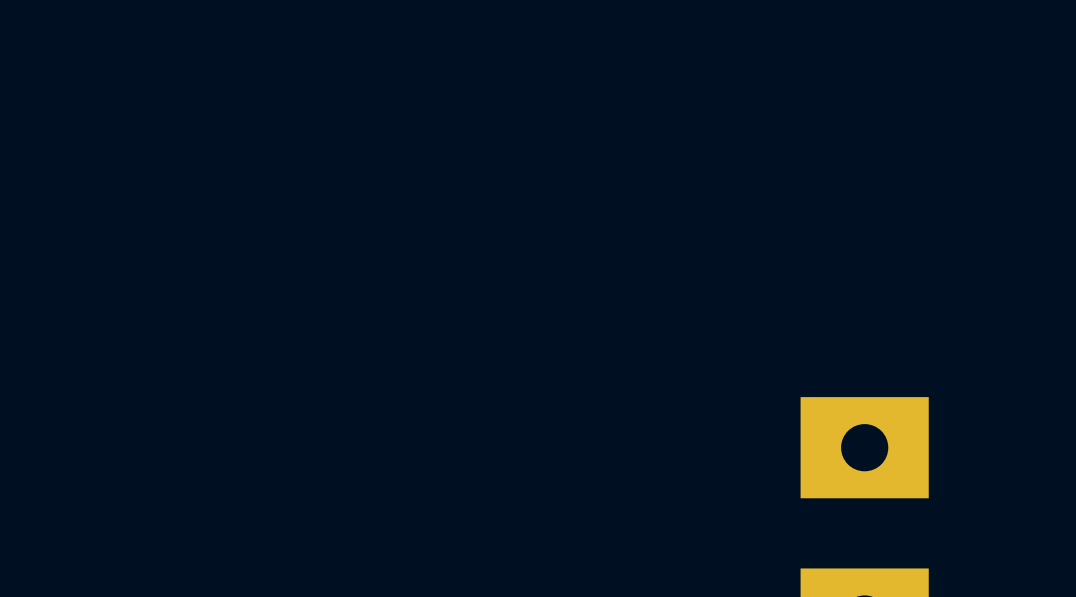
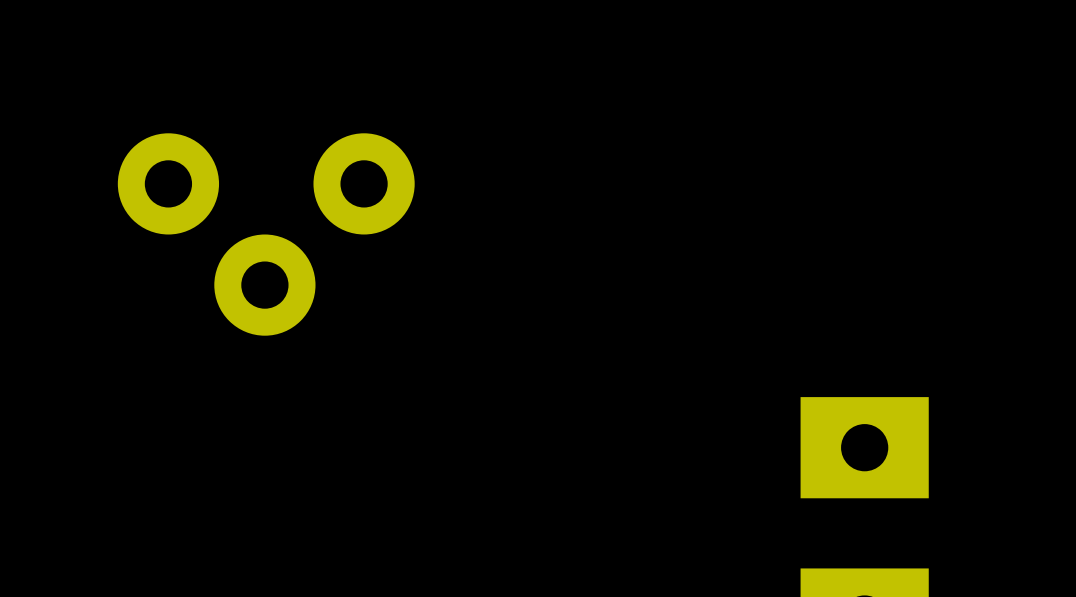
part: none -> (266, 234)

